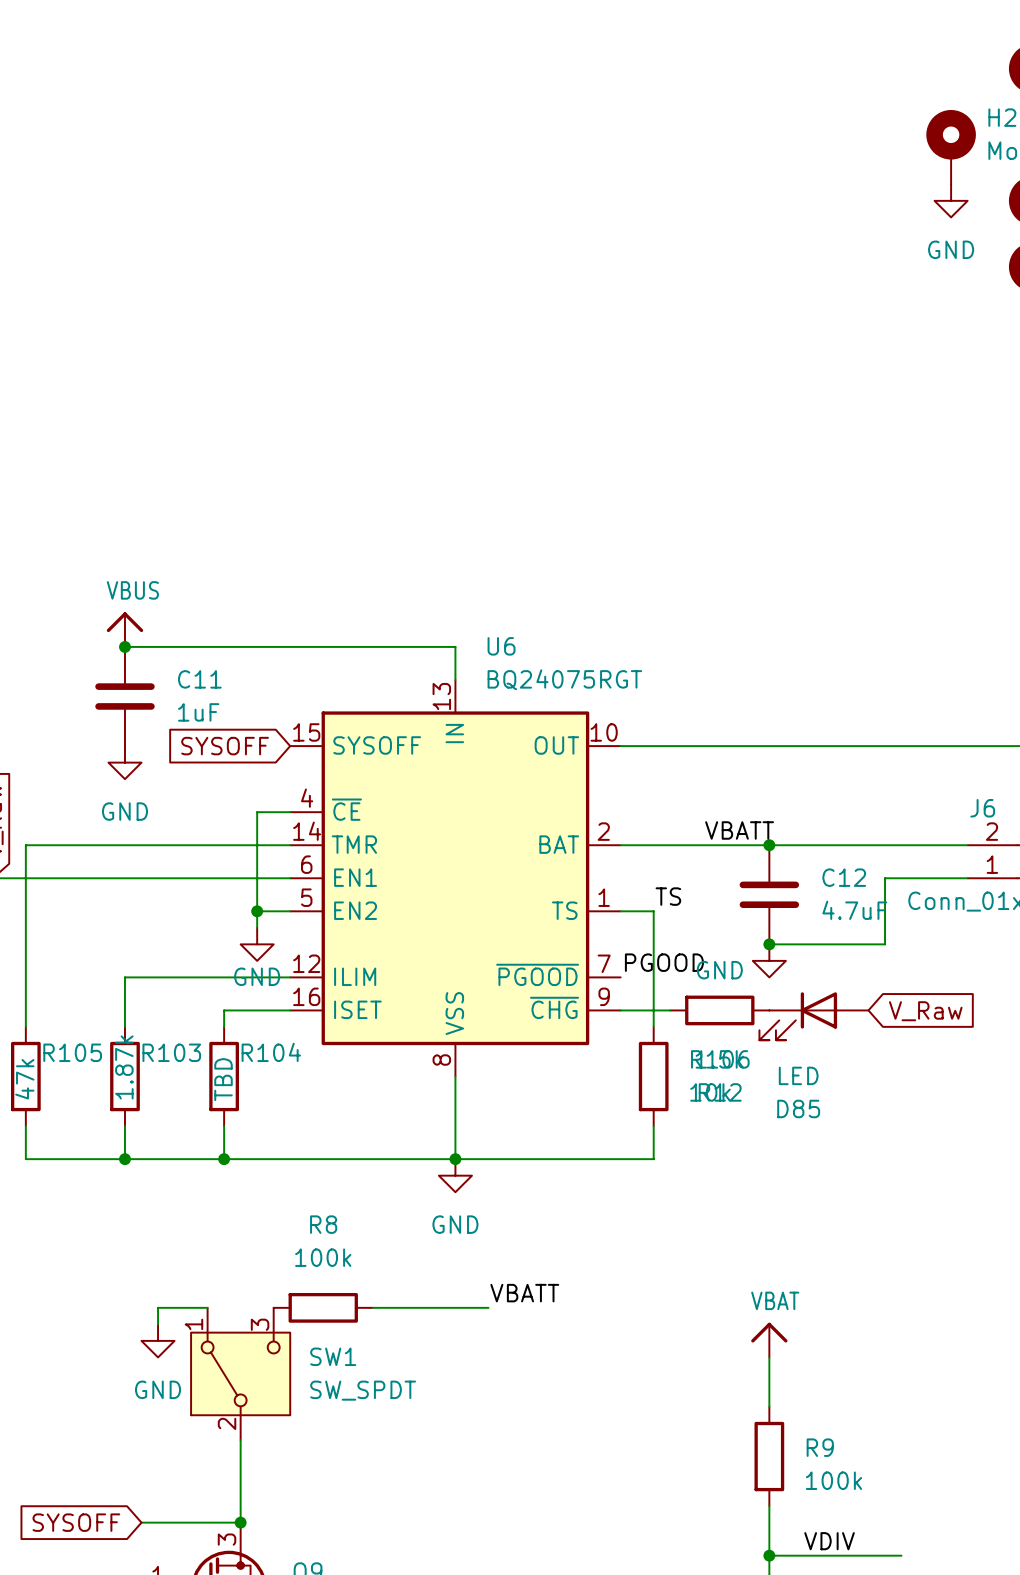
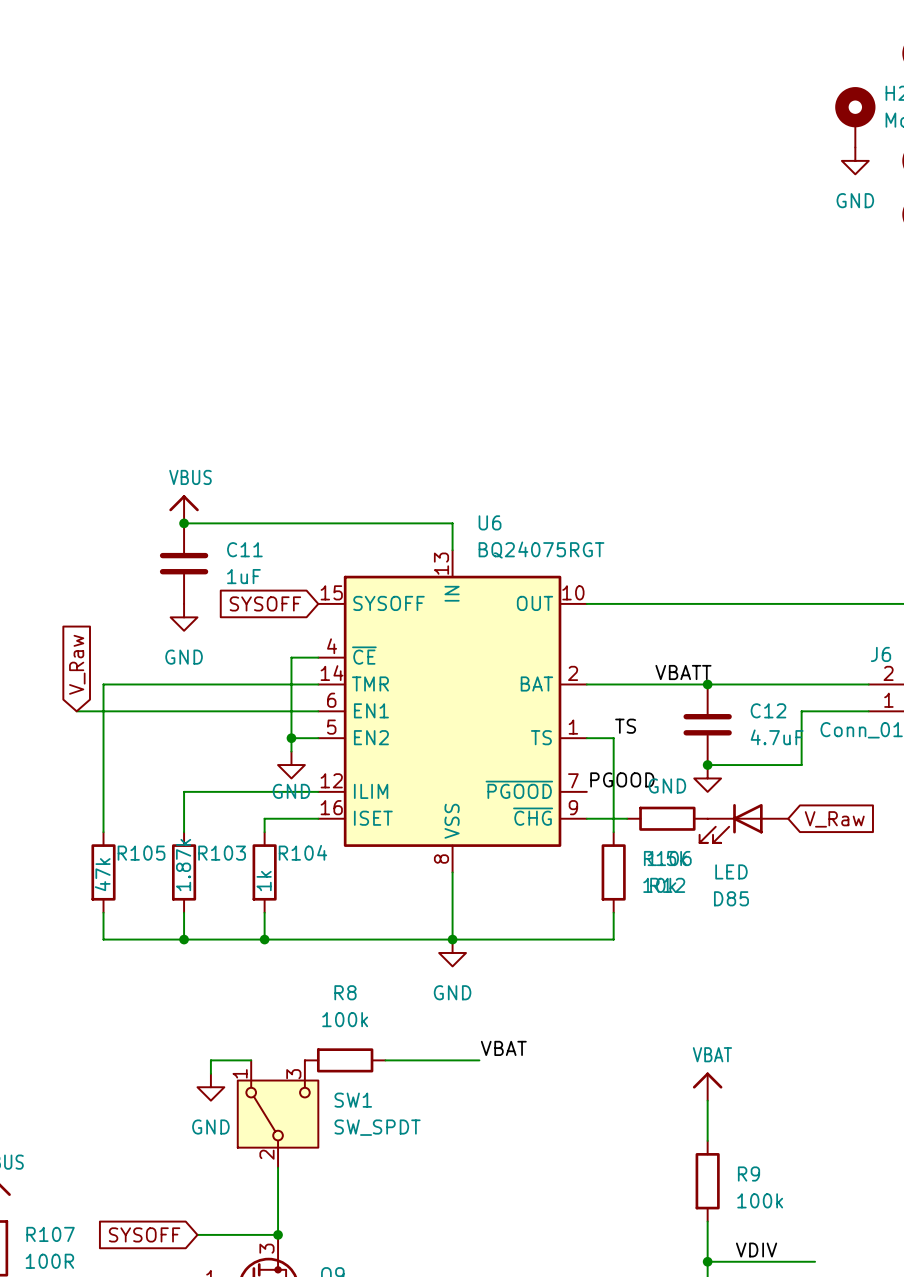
R104 value: TBD (223, 1079) -> 1k (264, 881)
label: VBATT (524, 1293) -> VBAT (503, 1048)

